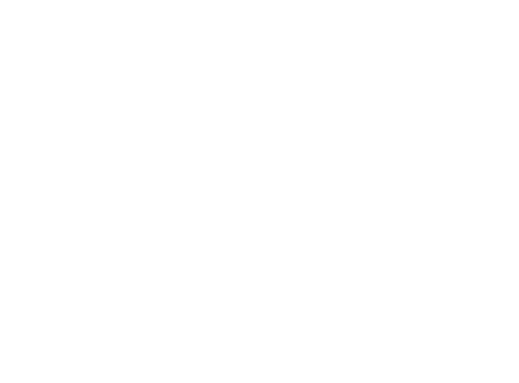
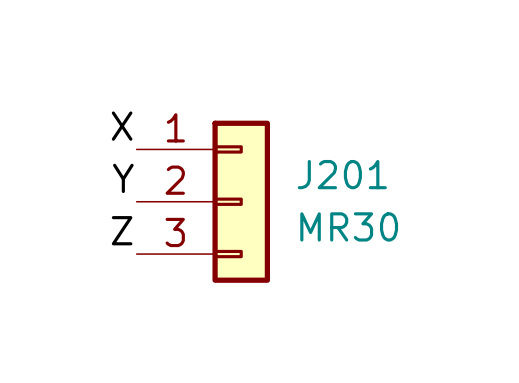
label: none -> X (122, 126)
label: none -> Y (123, 178)
J201: none -> MR30 (203, 201)
label: none -> Z (122, 230)

